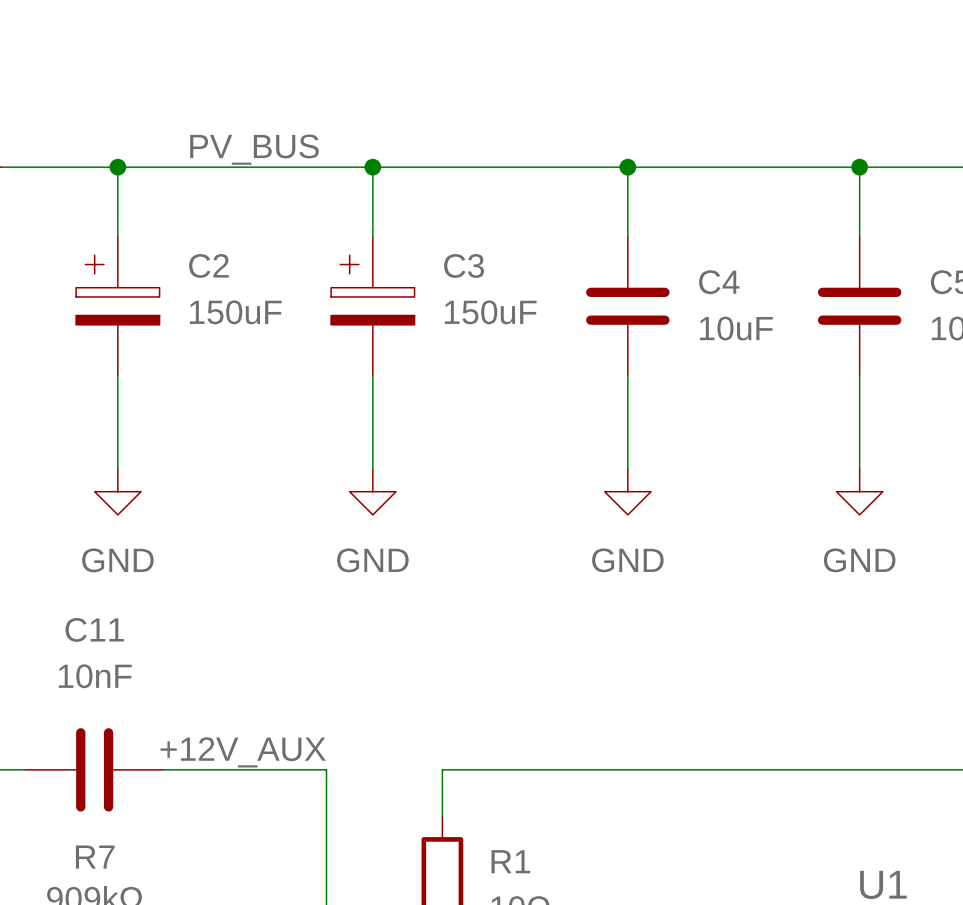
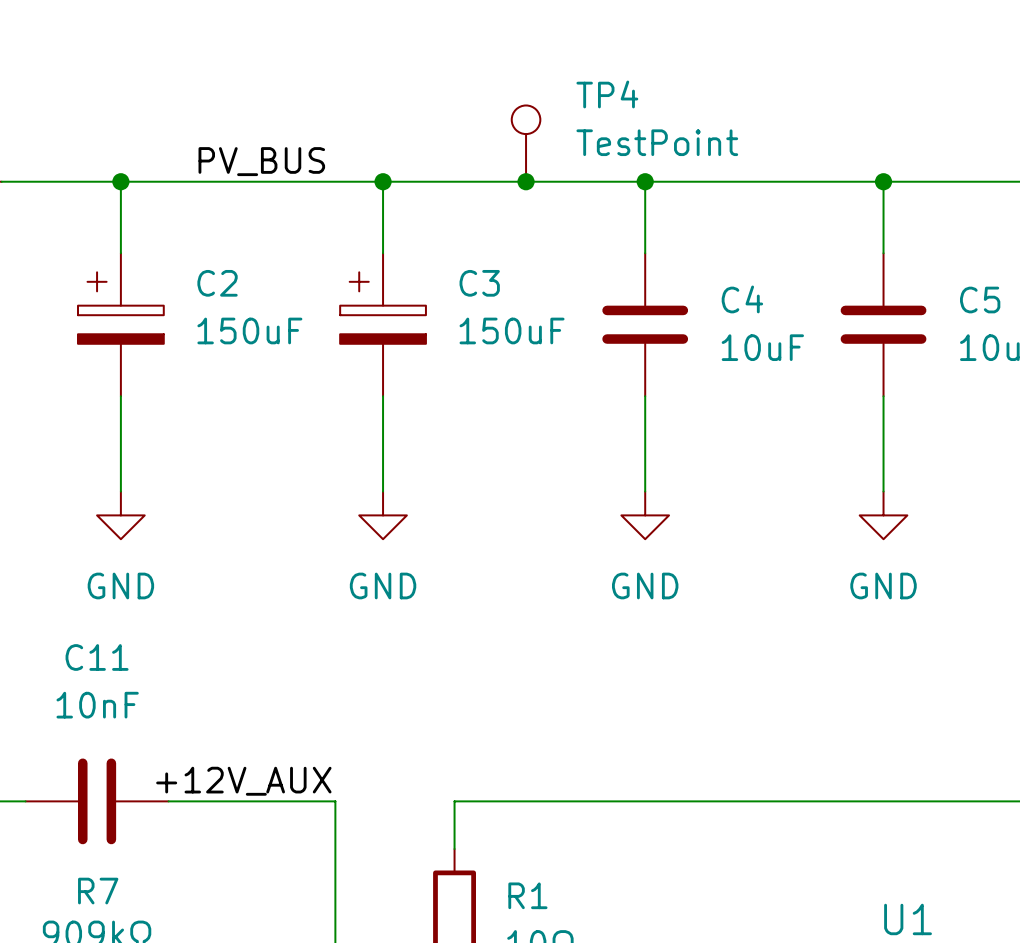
TP4: none -> TestPoint (526, 143)
junction: none -> (526, 181)

